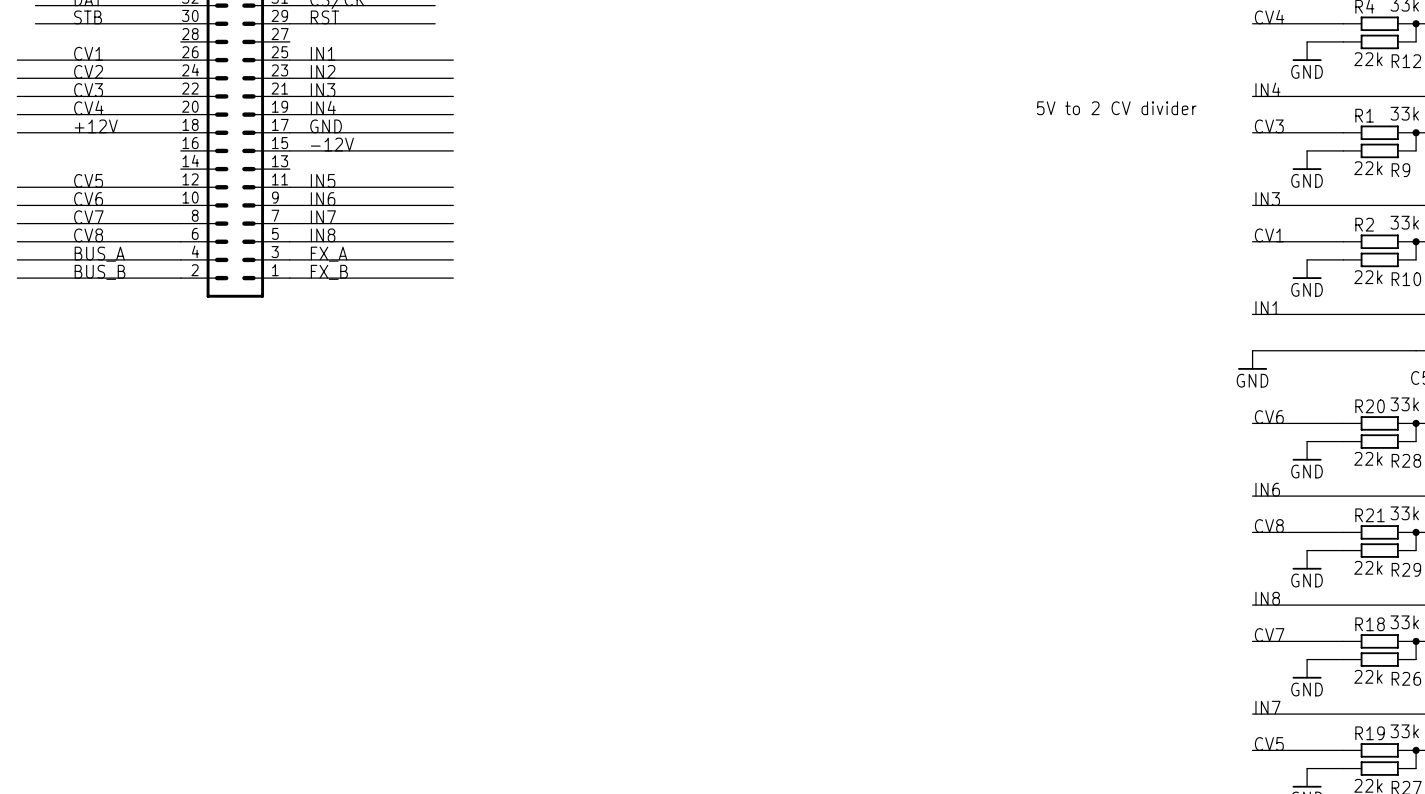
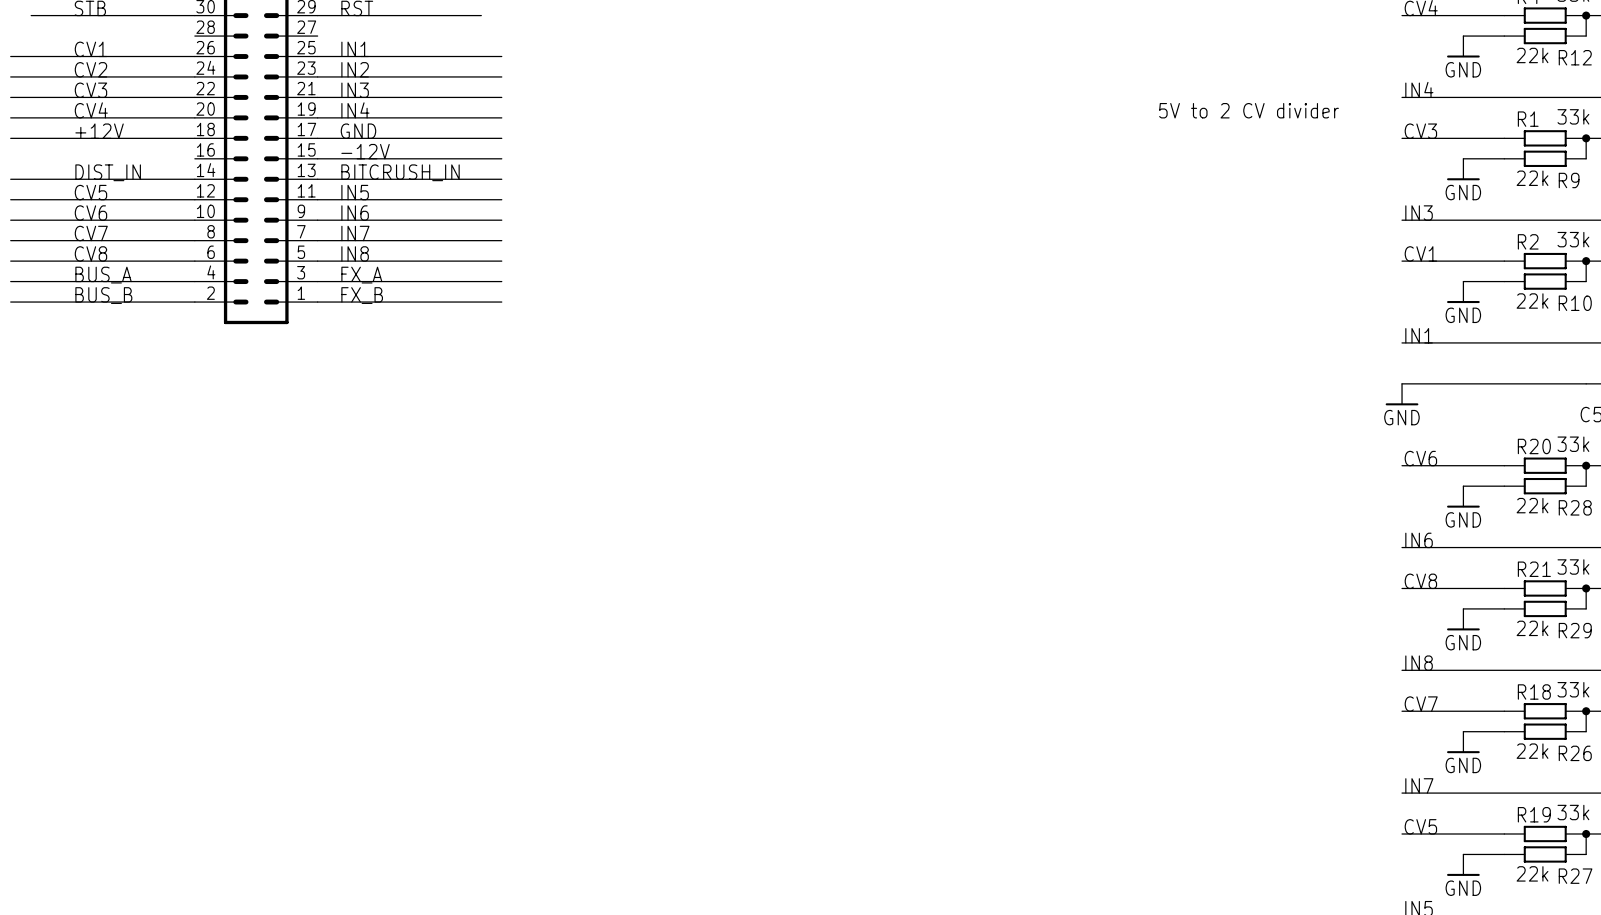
label: none -> DIST_IN (108, 172)
label: none -> BITCRUSH_IN (400, 172)
wire: none -> (10, 179) (194, 179)
wire: none -> (317, 179) (501, 179)

